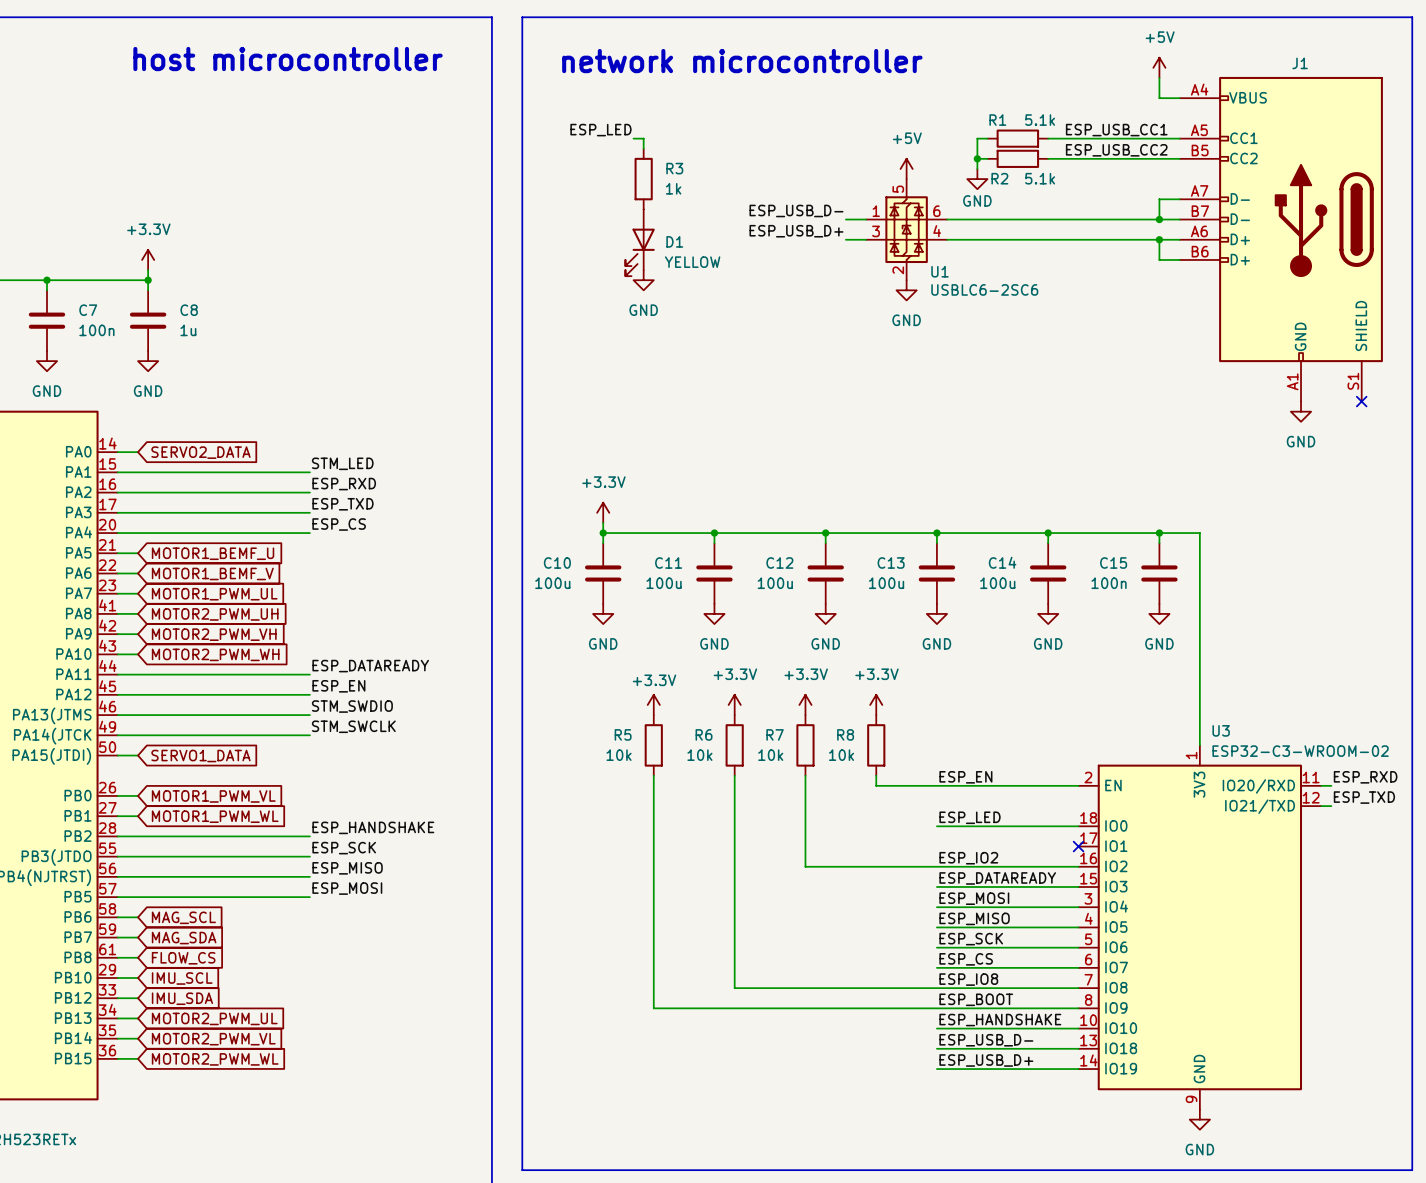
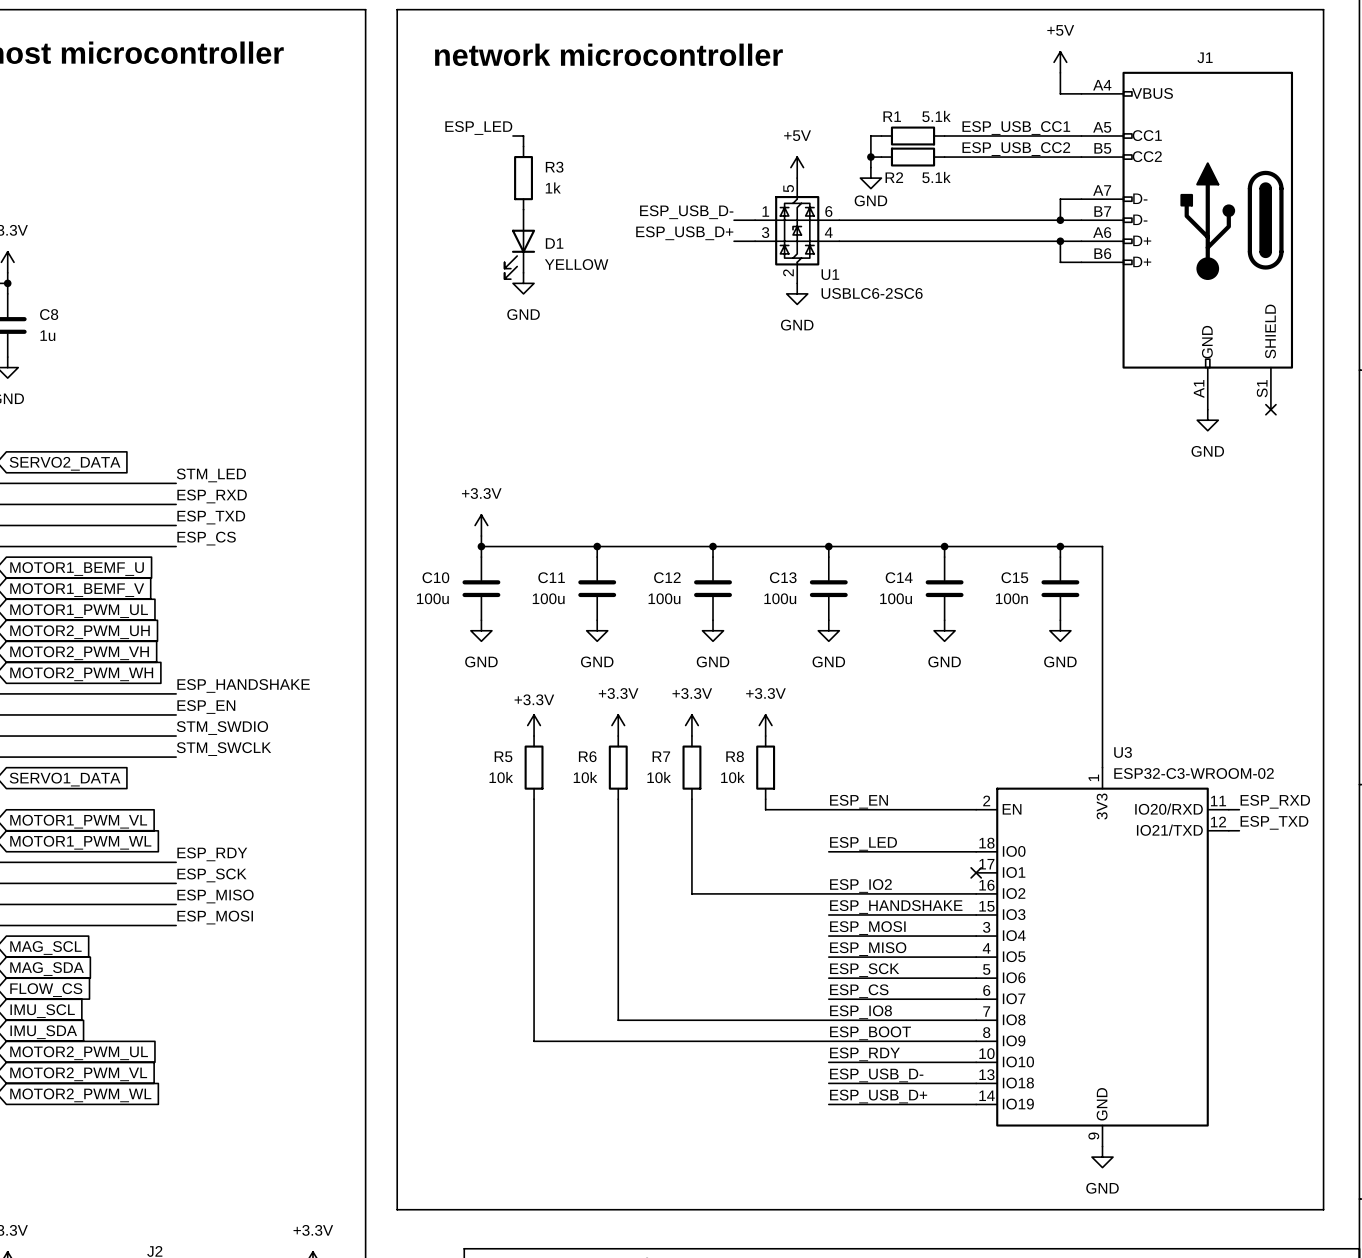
label: ESP_DATAREADY (370, 666) -> ESP_HANDSHAKE (243, 685)
label: ESP_HANDSHAKE (373, 827) -> ESP_RDY (212, 854)
label: ESP_DATAREADY (997, 878) -> ESP_HANDSHAKE (896, 907)
label: ESP_HANDSHAKE (1000, 1020) -> ESP_RDY (864, 1054)

